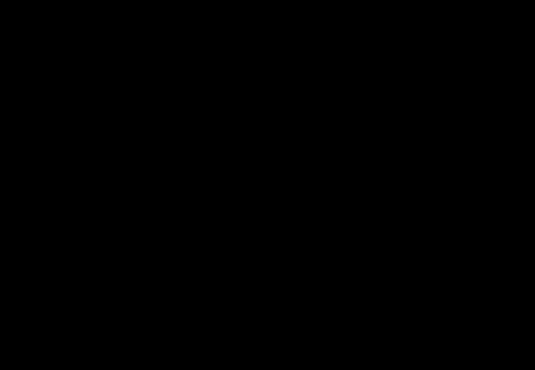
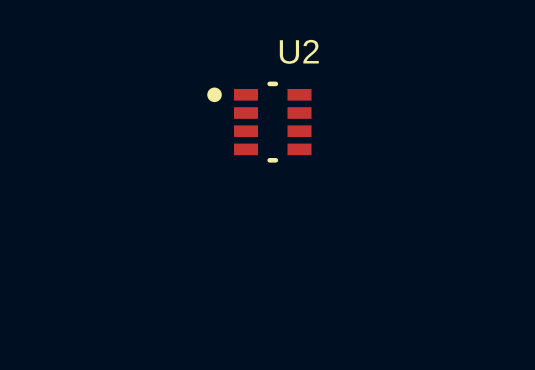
U2: none -> (259, 122)

